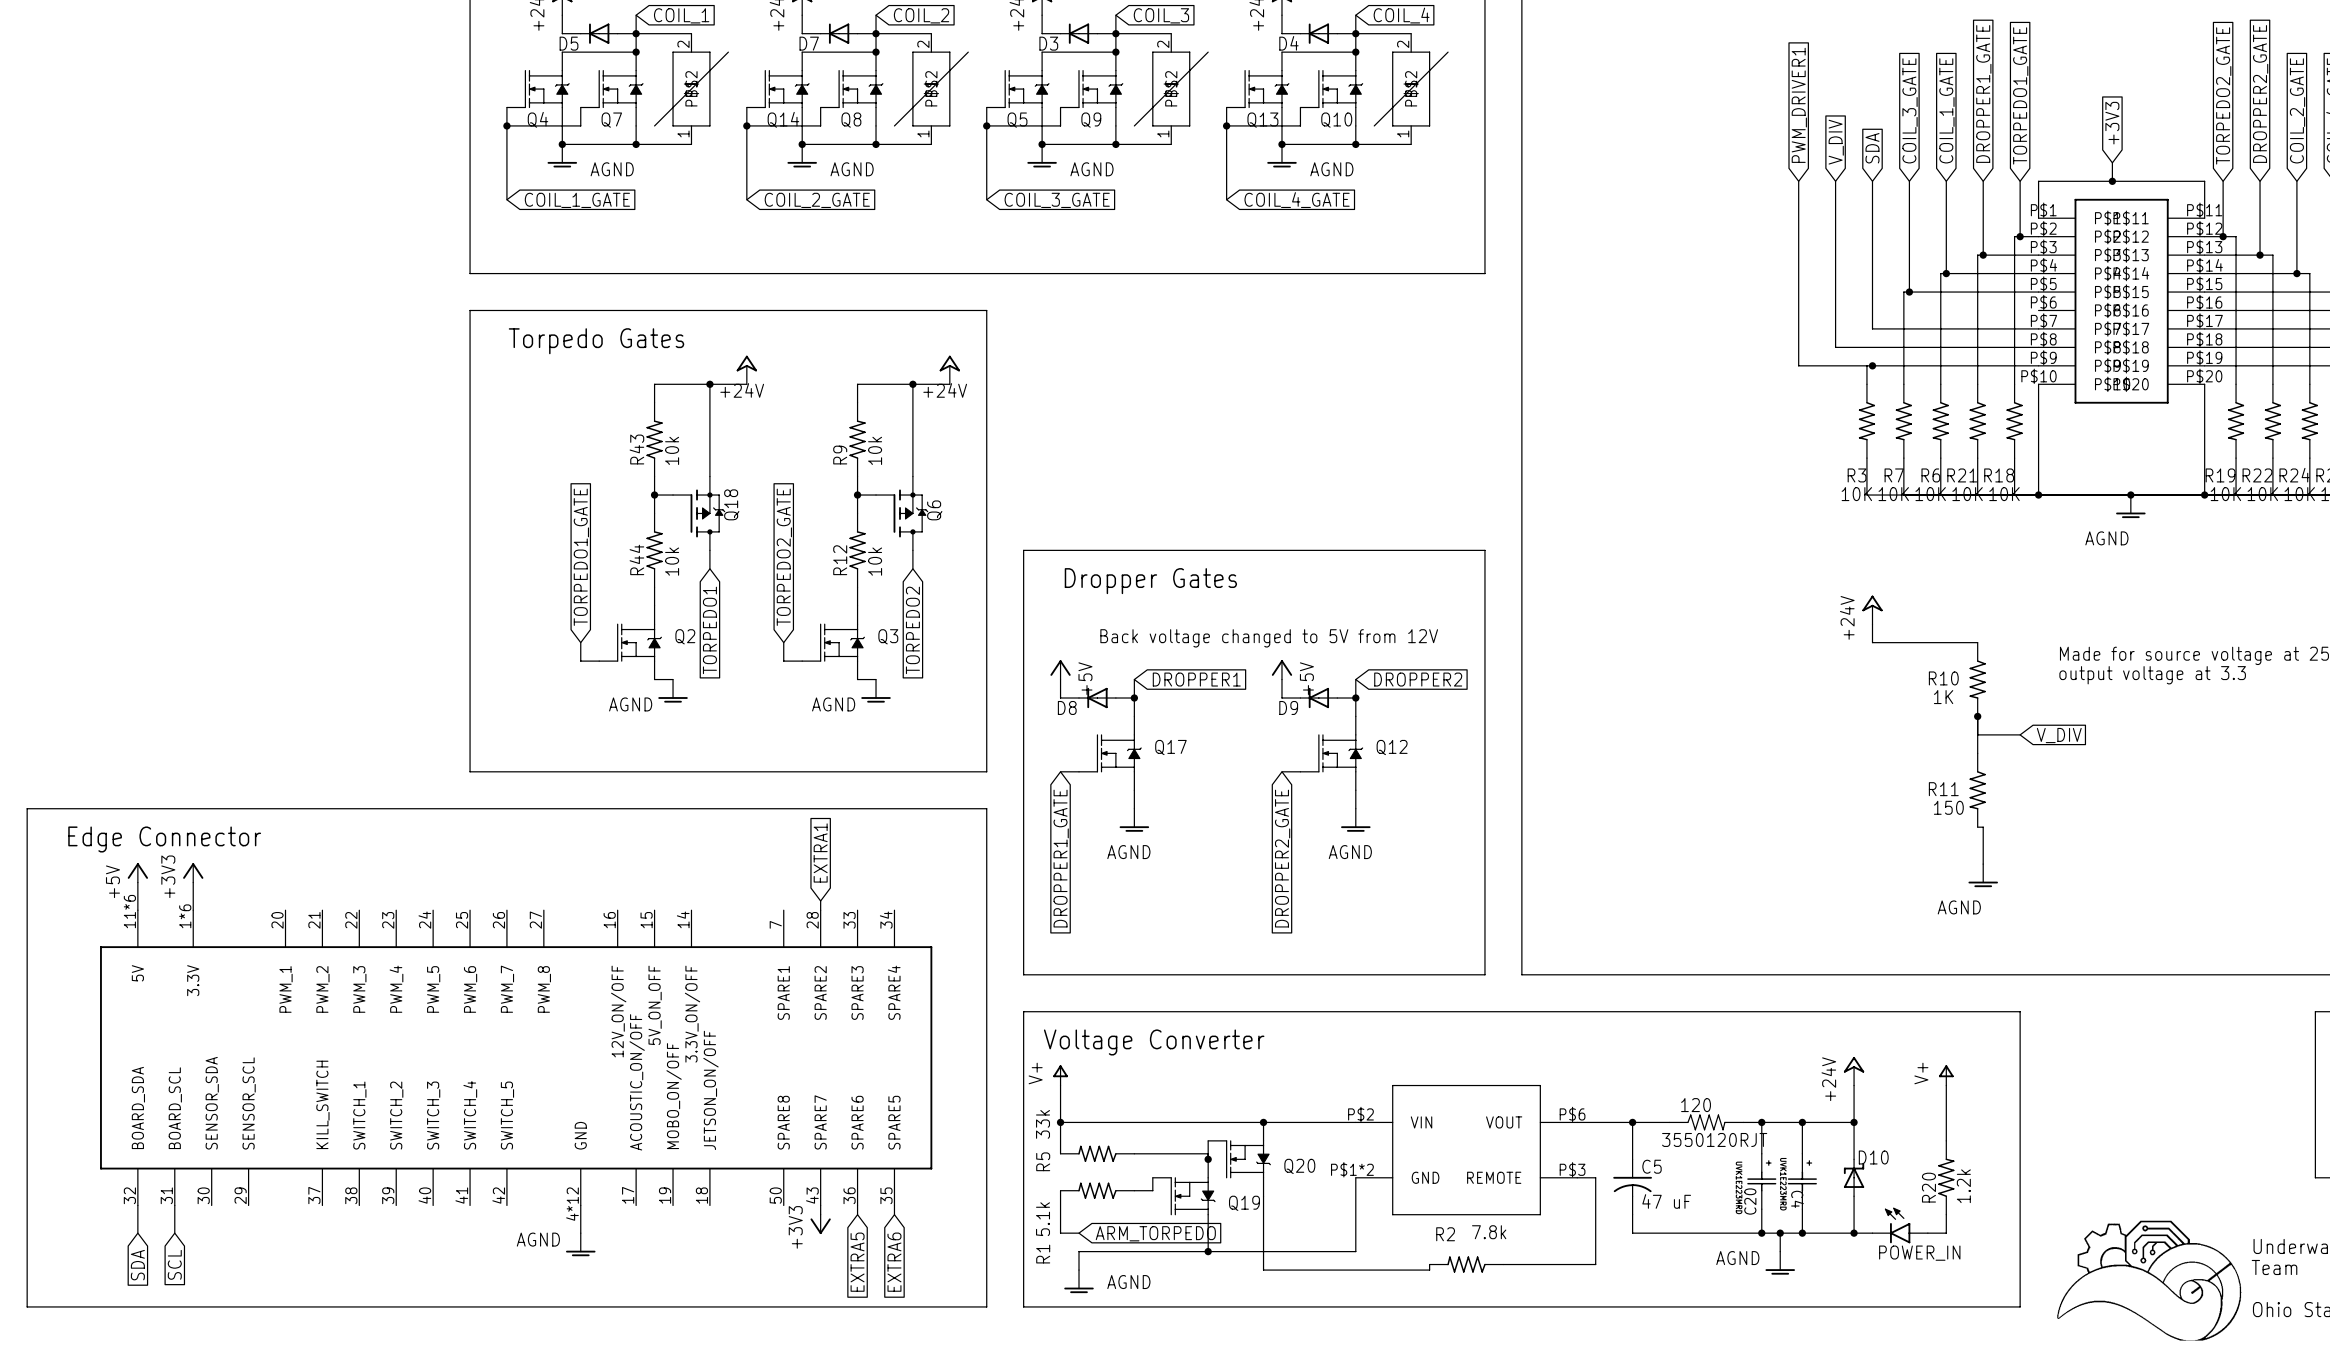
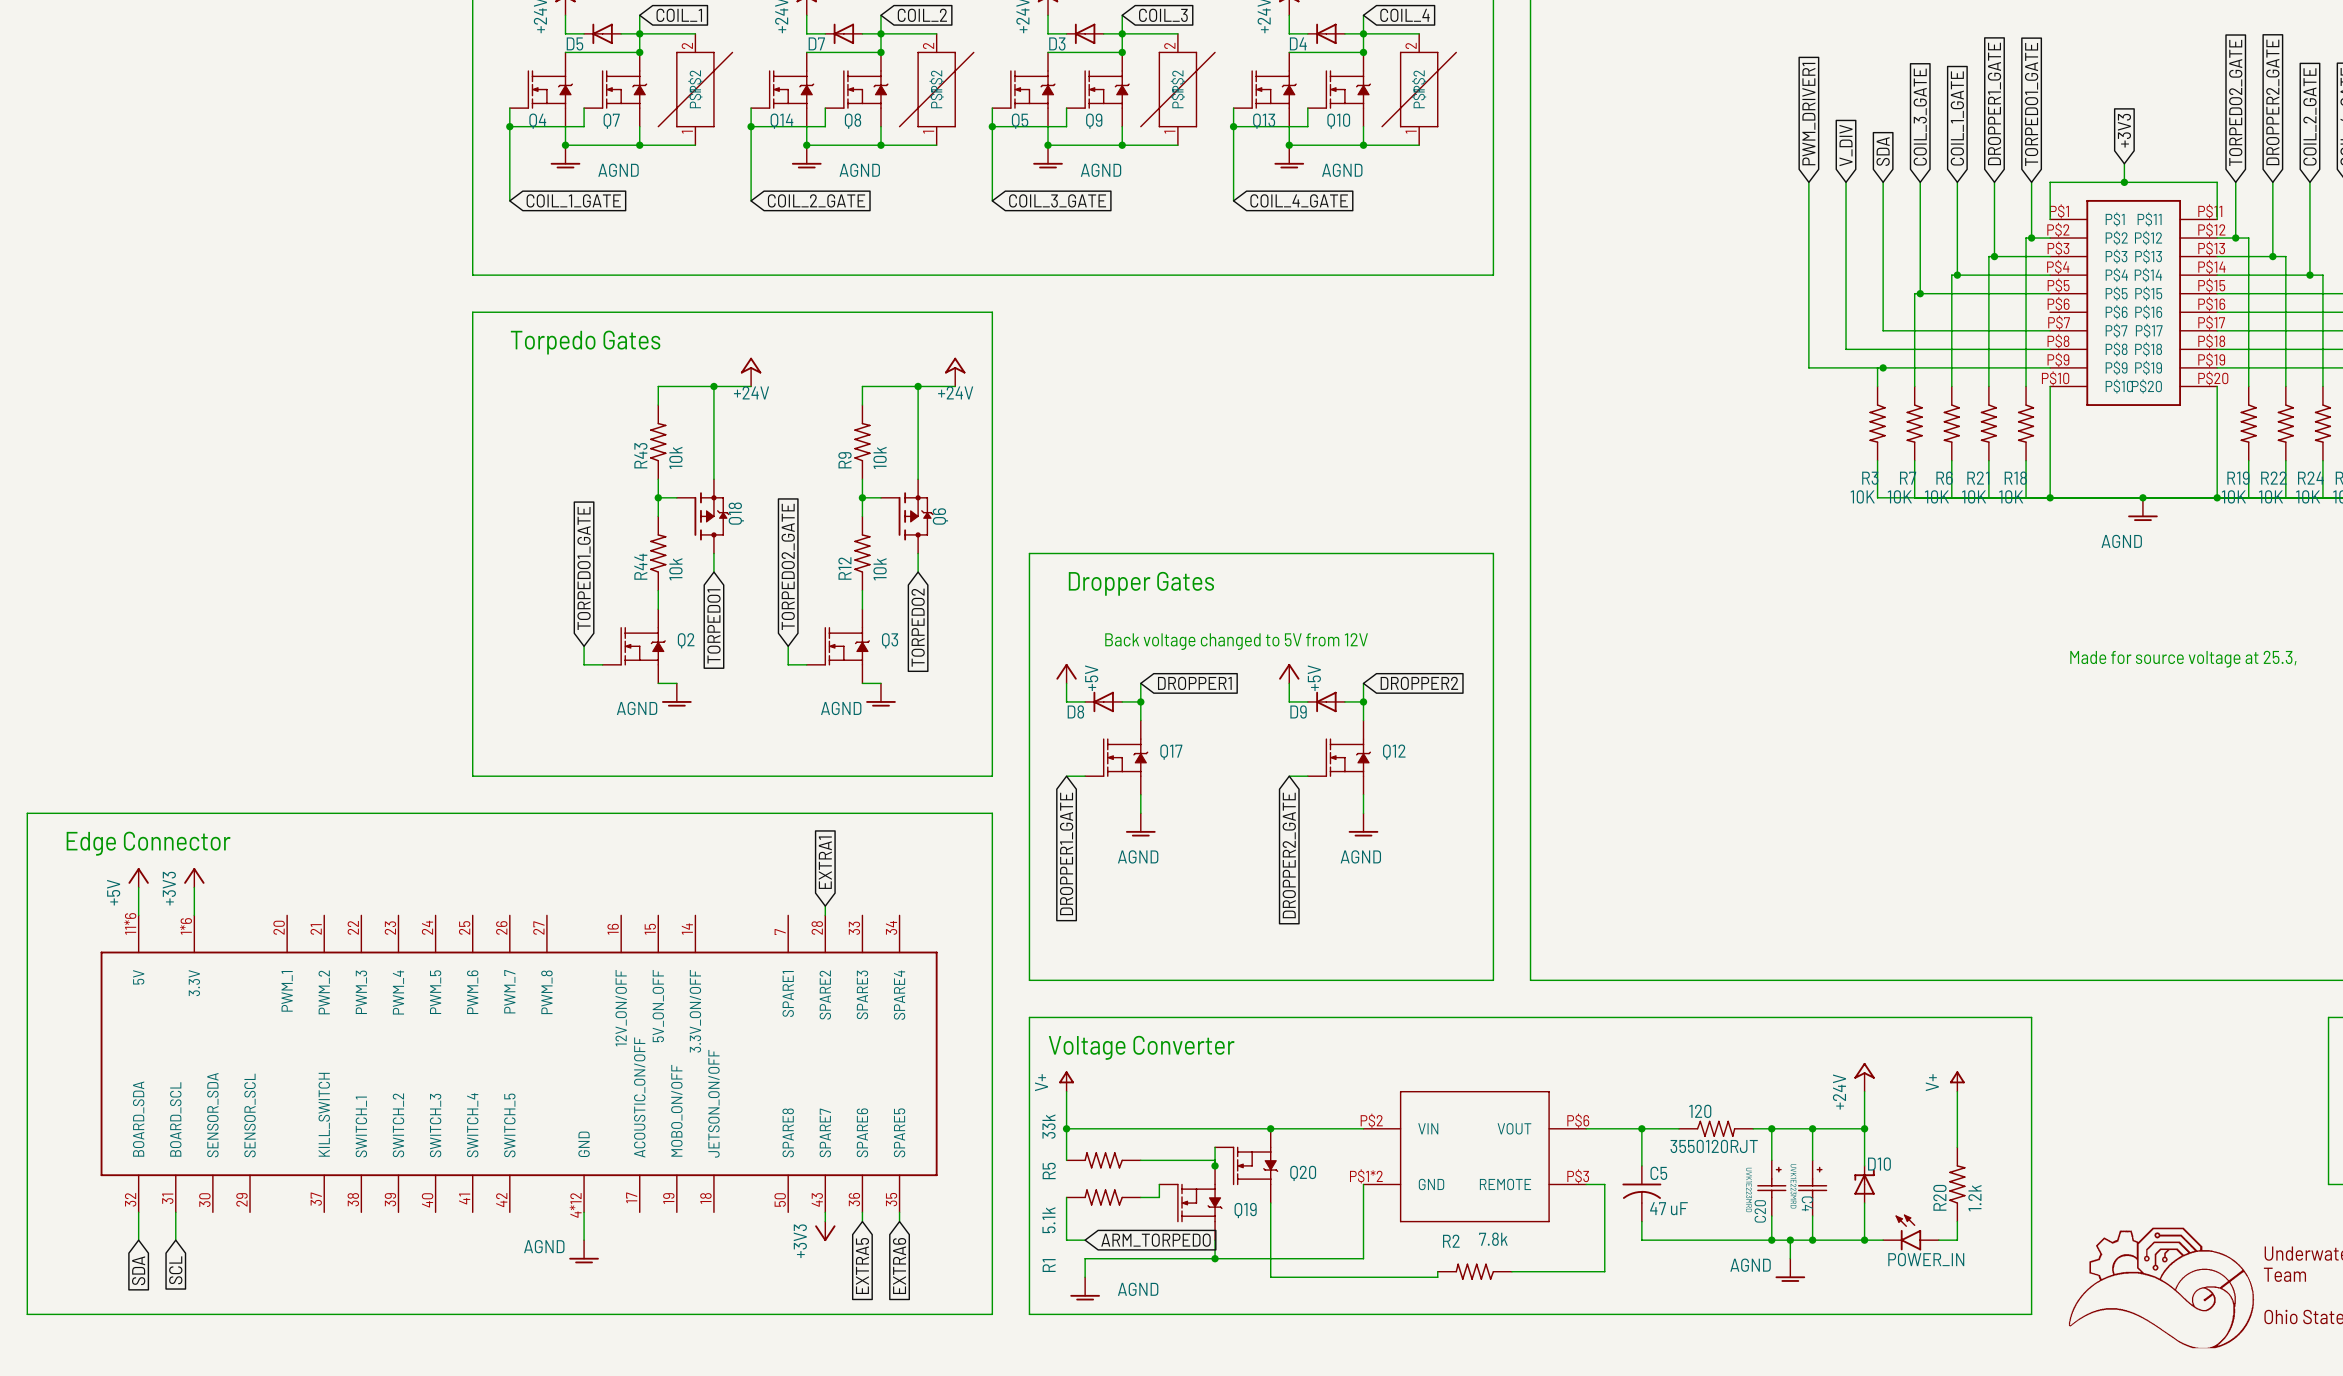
power symbol: +24V (1872, 609) -> none
wire: (1872, 624) (1872, 642) (1977, 642) -> none
text: output voltage at 3.3 (2152, 675) -> none
R10: 1K (1977, 679) -> none
wire: (1977, 716) (1977, 753) -> none
junction: (1977, 716) -> none
wire: (1977, 734) (2020, 734) -> none
global label: V_DIV (2059, 735) -> none
R11: 150 (1977, 790) -> none
wire: (1977, 827) (1983, 827) (1983, 864) -> none
power symbol: AGND (1983, 875) -> none

